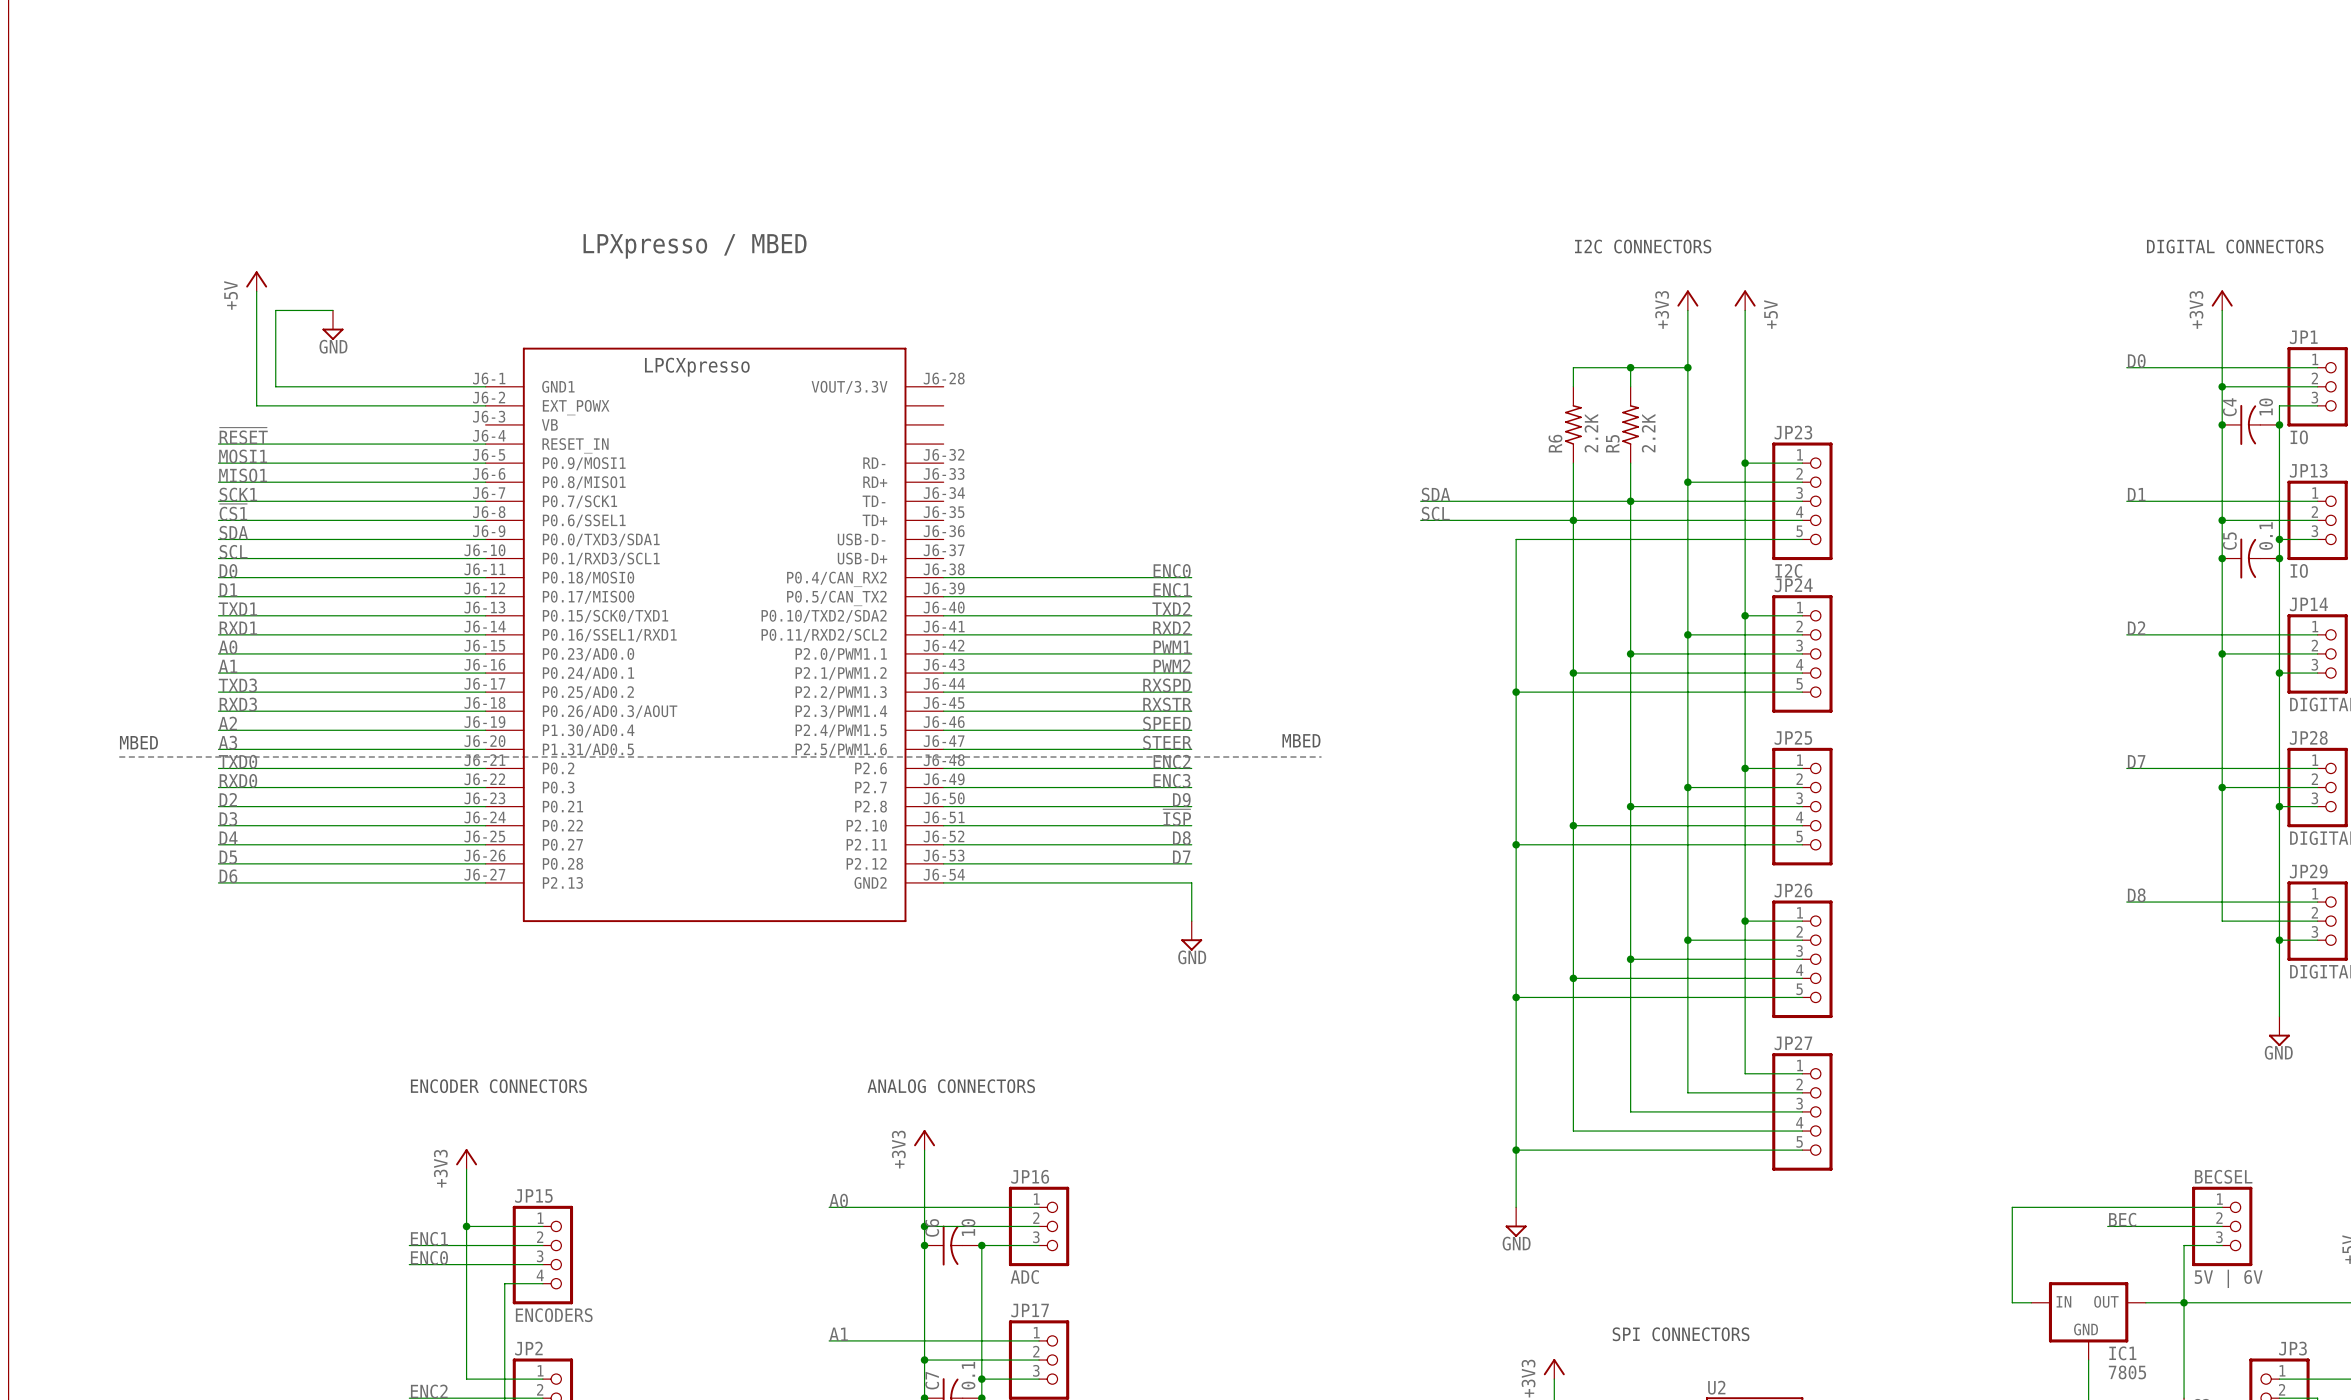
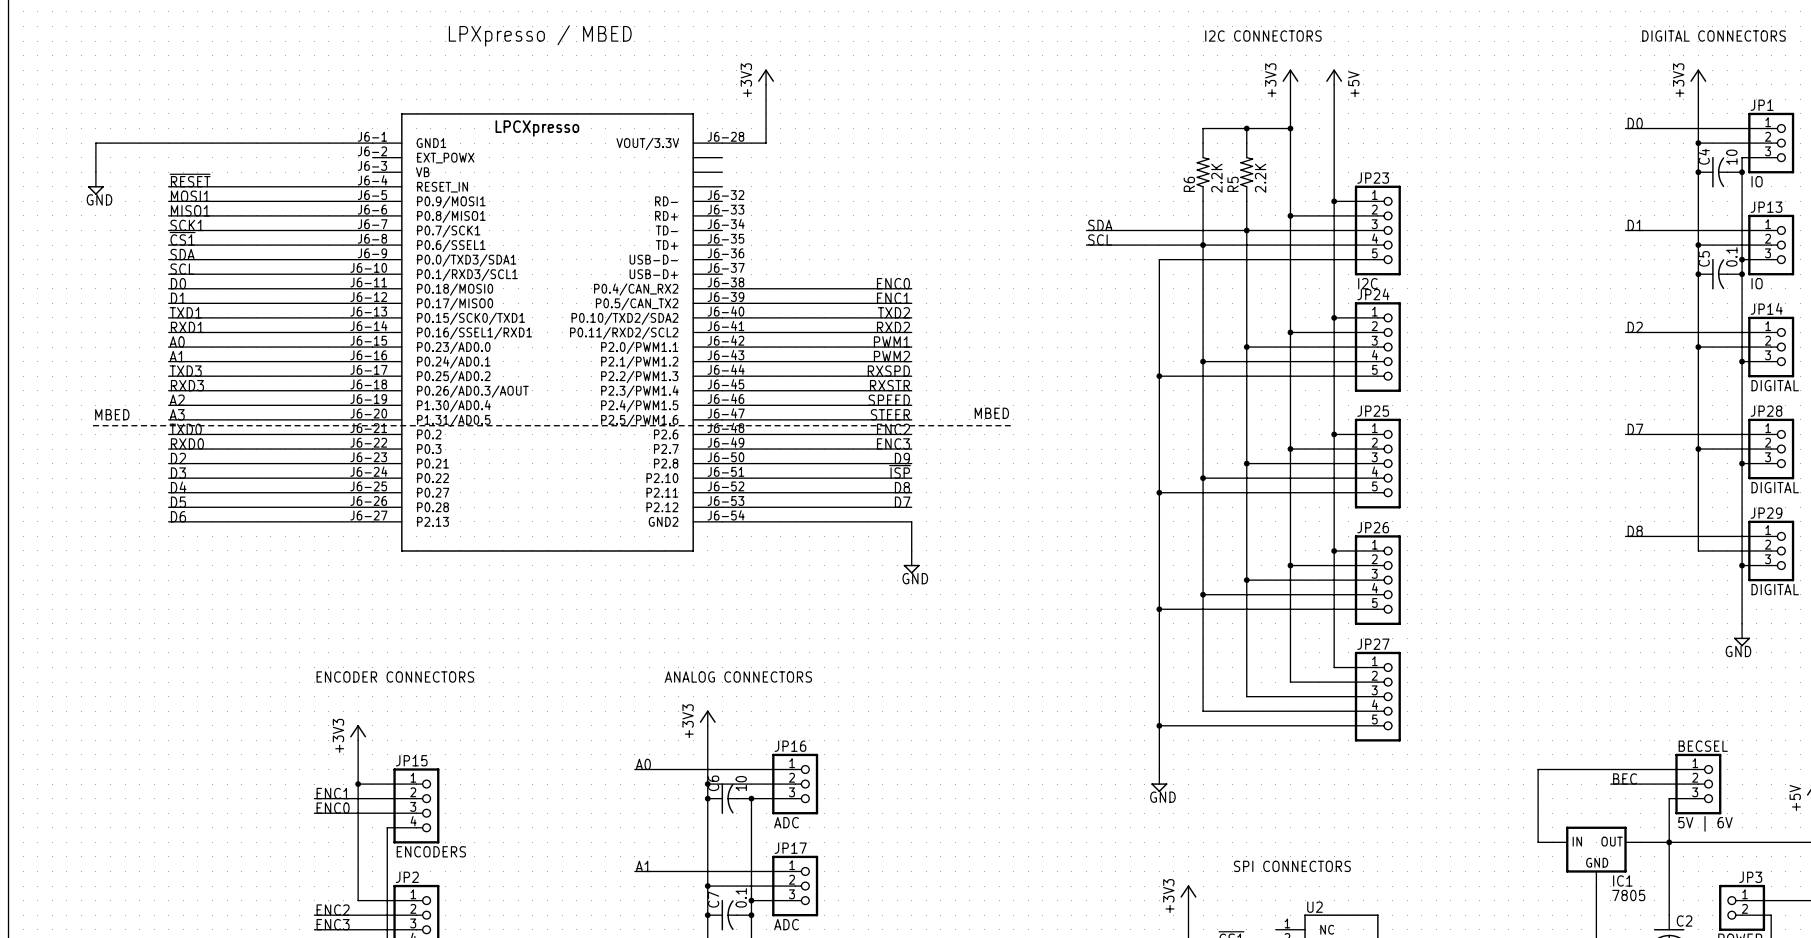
power symbol: +5V (256, 281) -> none
wire: (256, 291) (256, 405) (485, 405) -> none
power symbol: none -> +3V3 (766, 77)
wire: (332, 310) (275, 310) (275, 386) -> (95, 172) (95, 143) (212, 143)
wire: none -> (766, 84) (766, 143) (722, 143)
power symbol: GND (332, 325) -> none
power symbol: none -> GND (95, 183)

